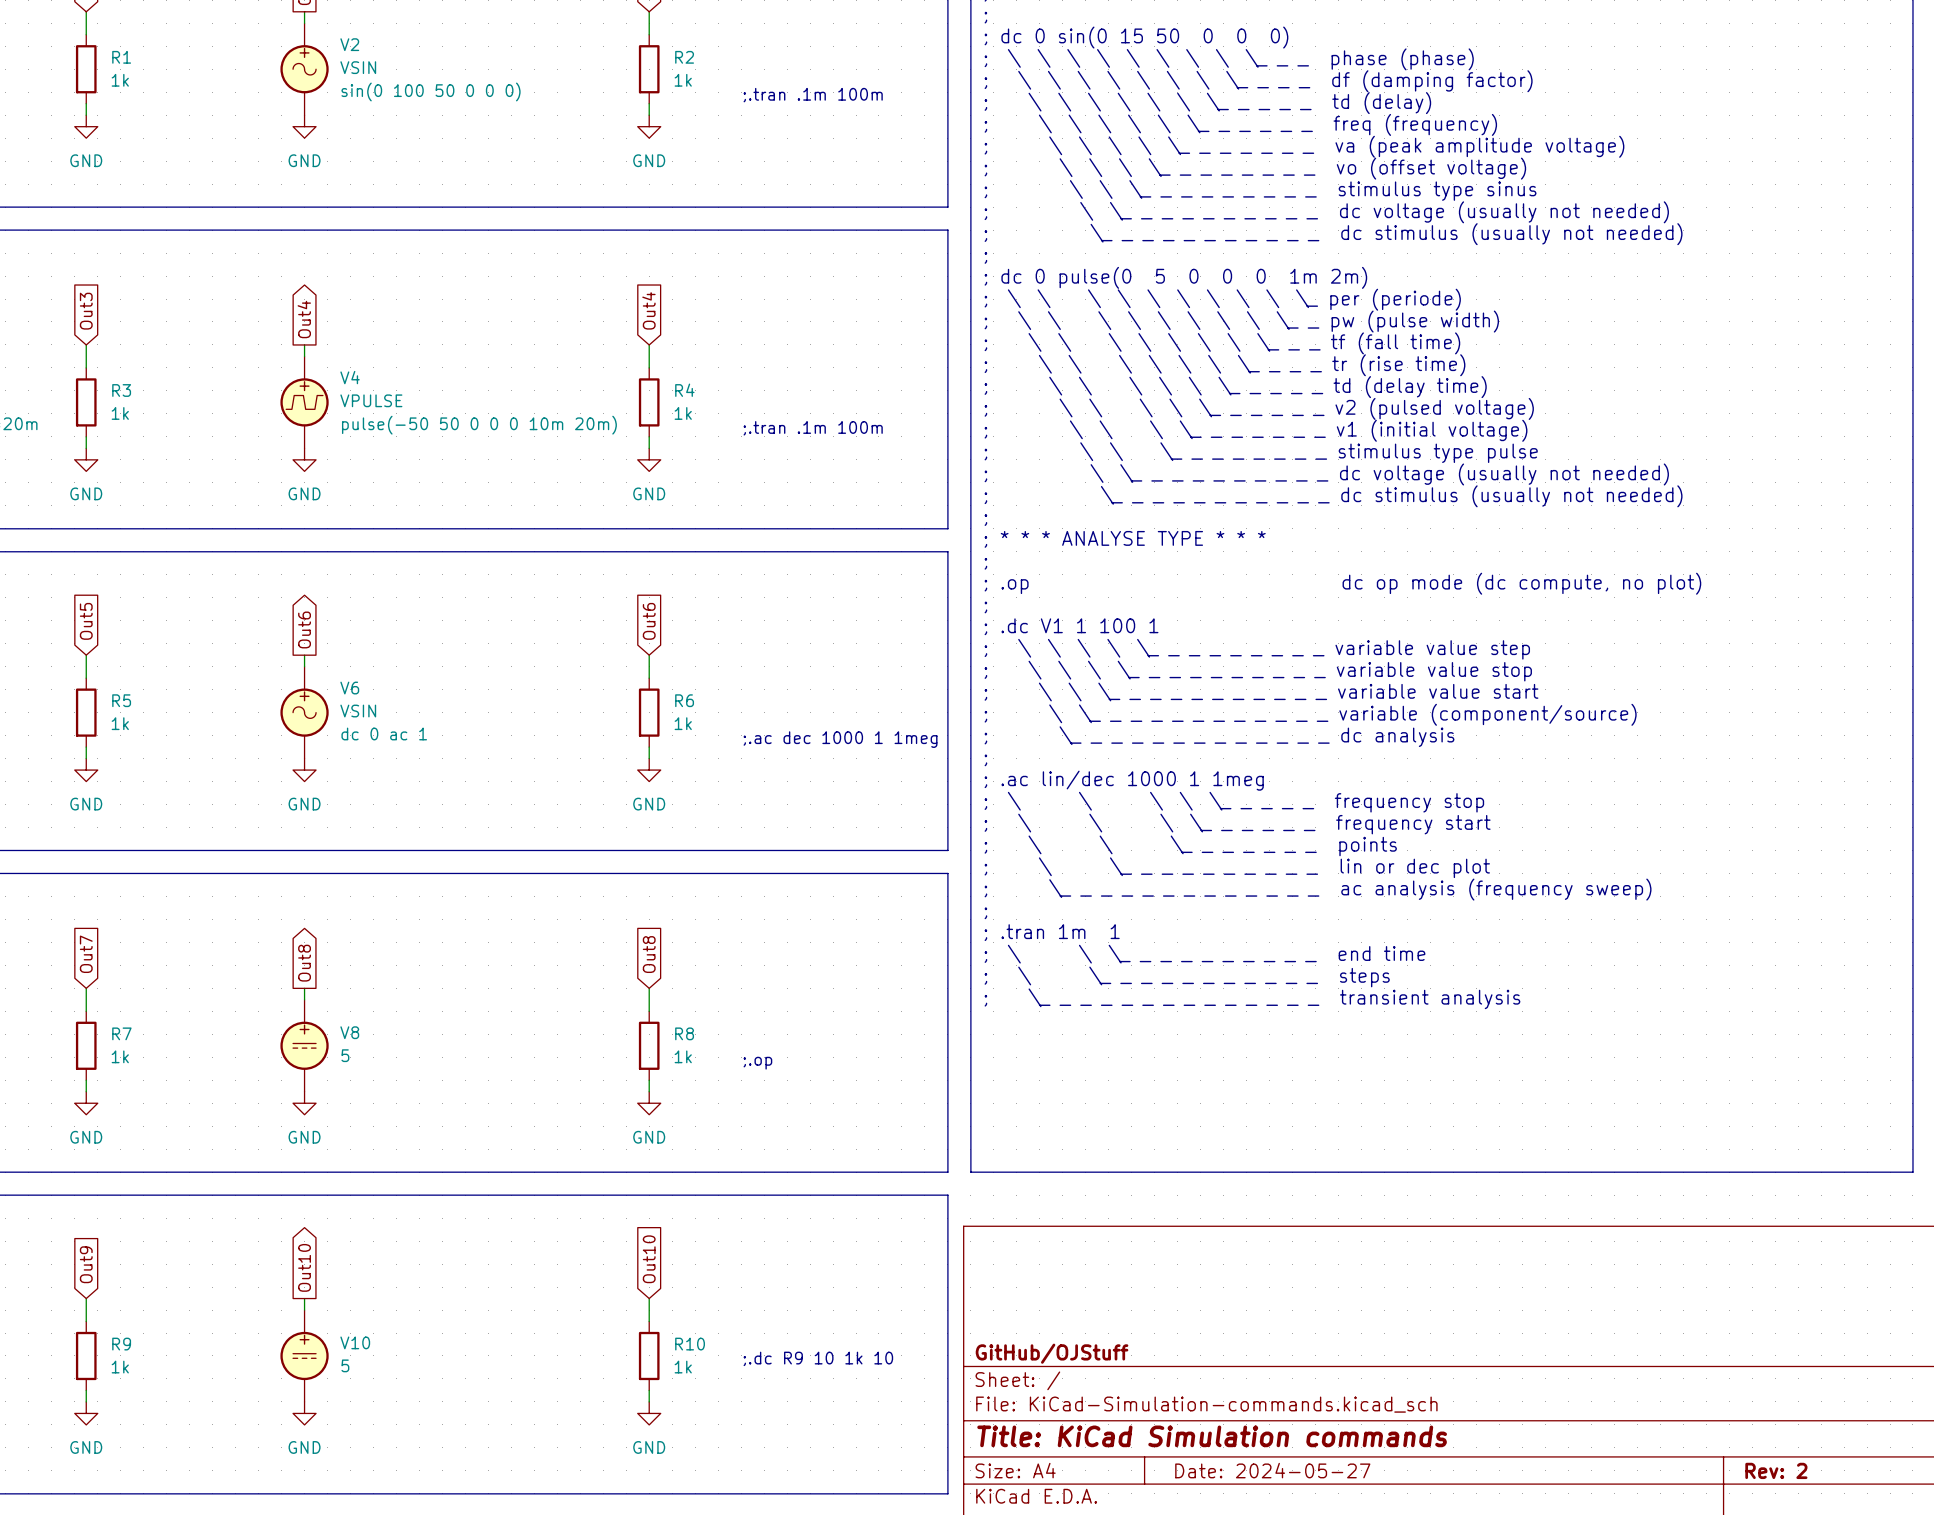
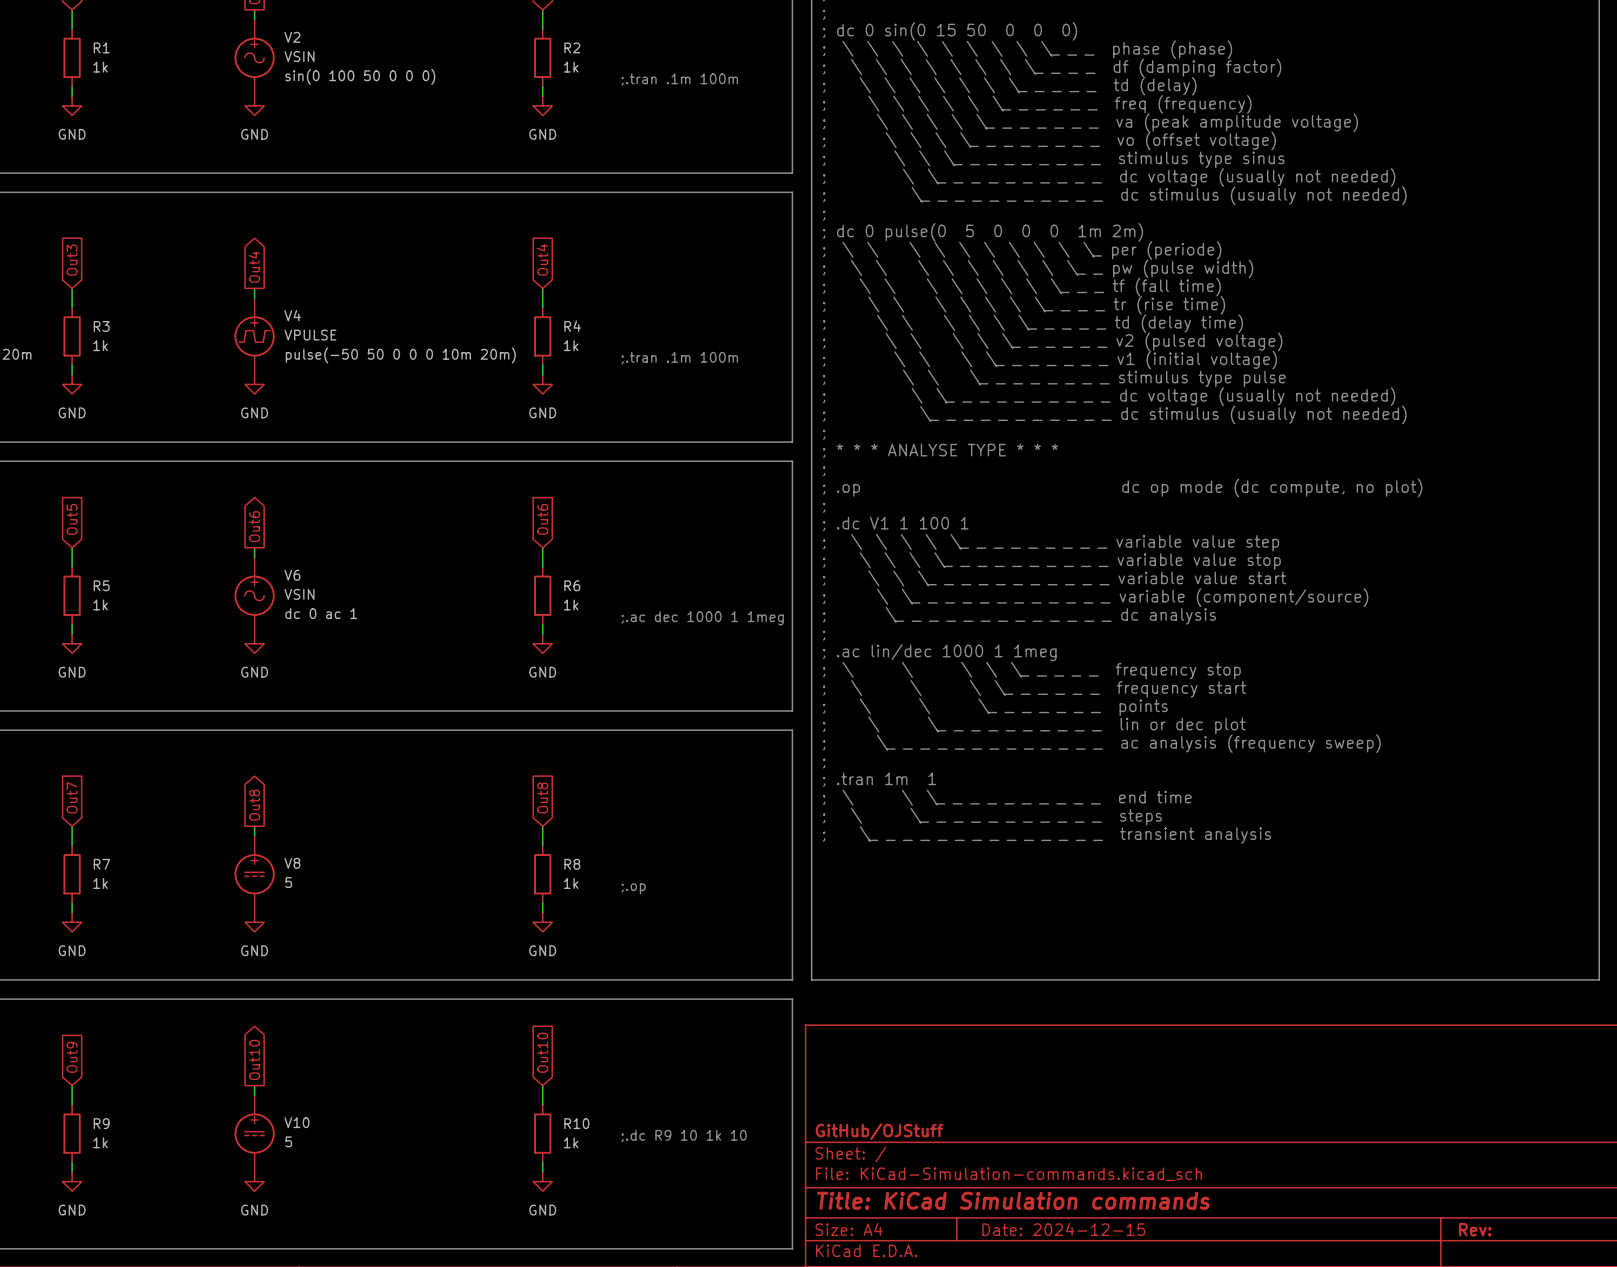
title block: Date: 2024-05-27 (1272, 1470) -> Date: 2024-12-15 (1063, 1229)
title block: Rev: 2 (1776, 1470) -> Rev: (1475, 1229)

